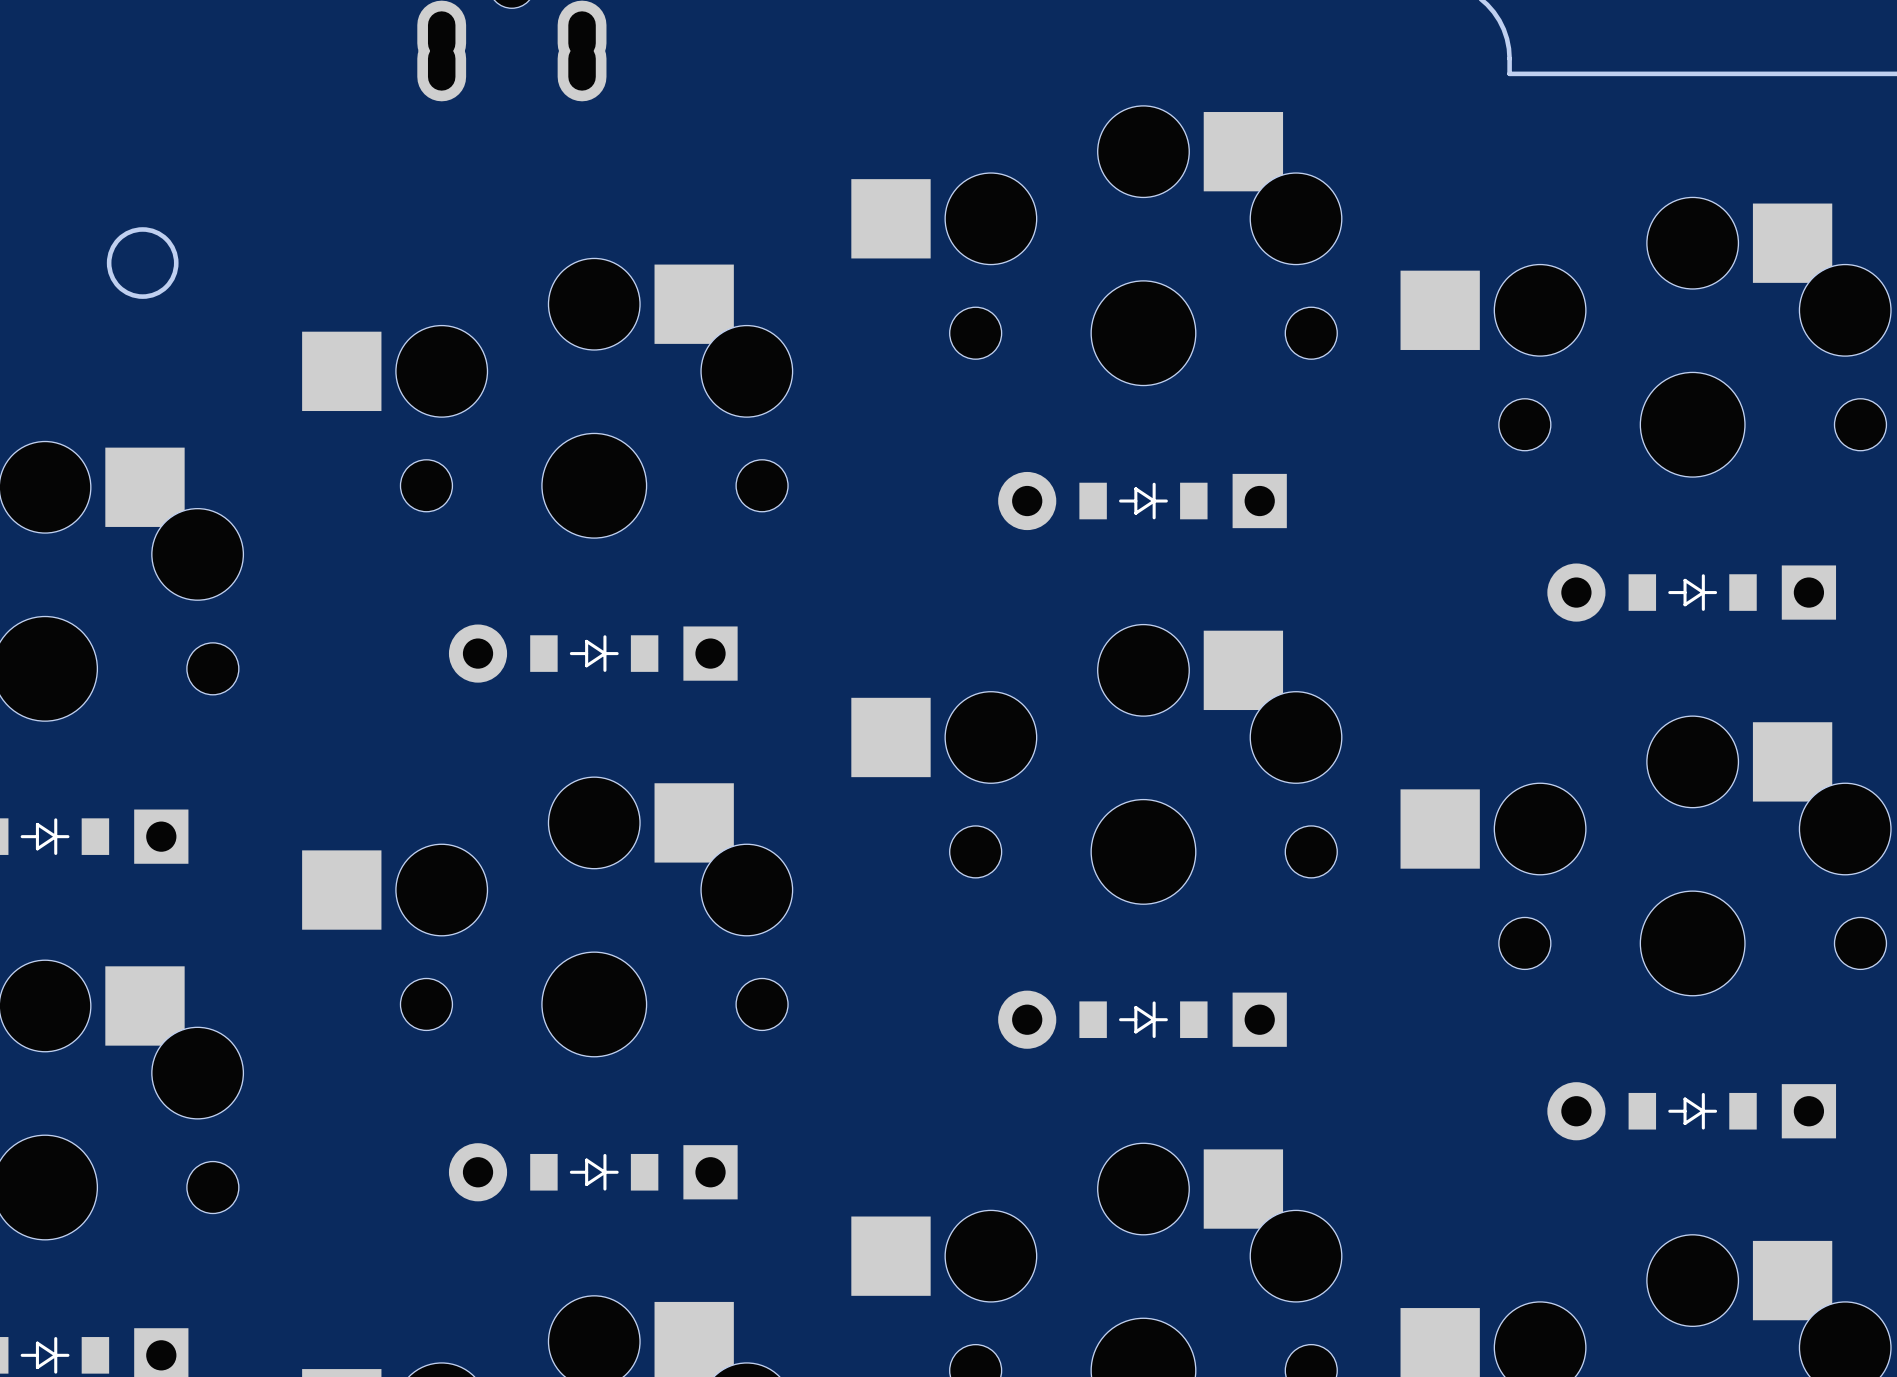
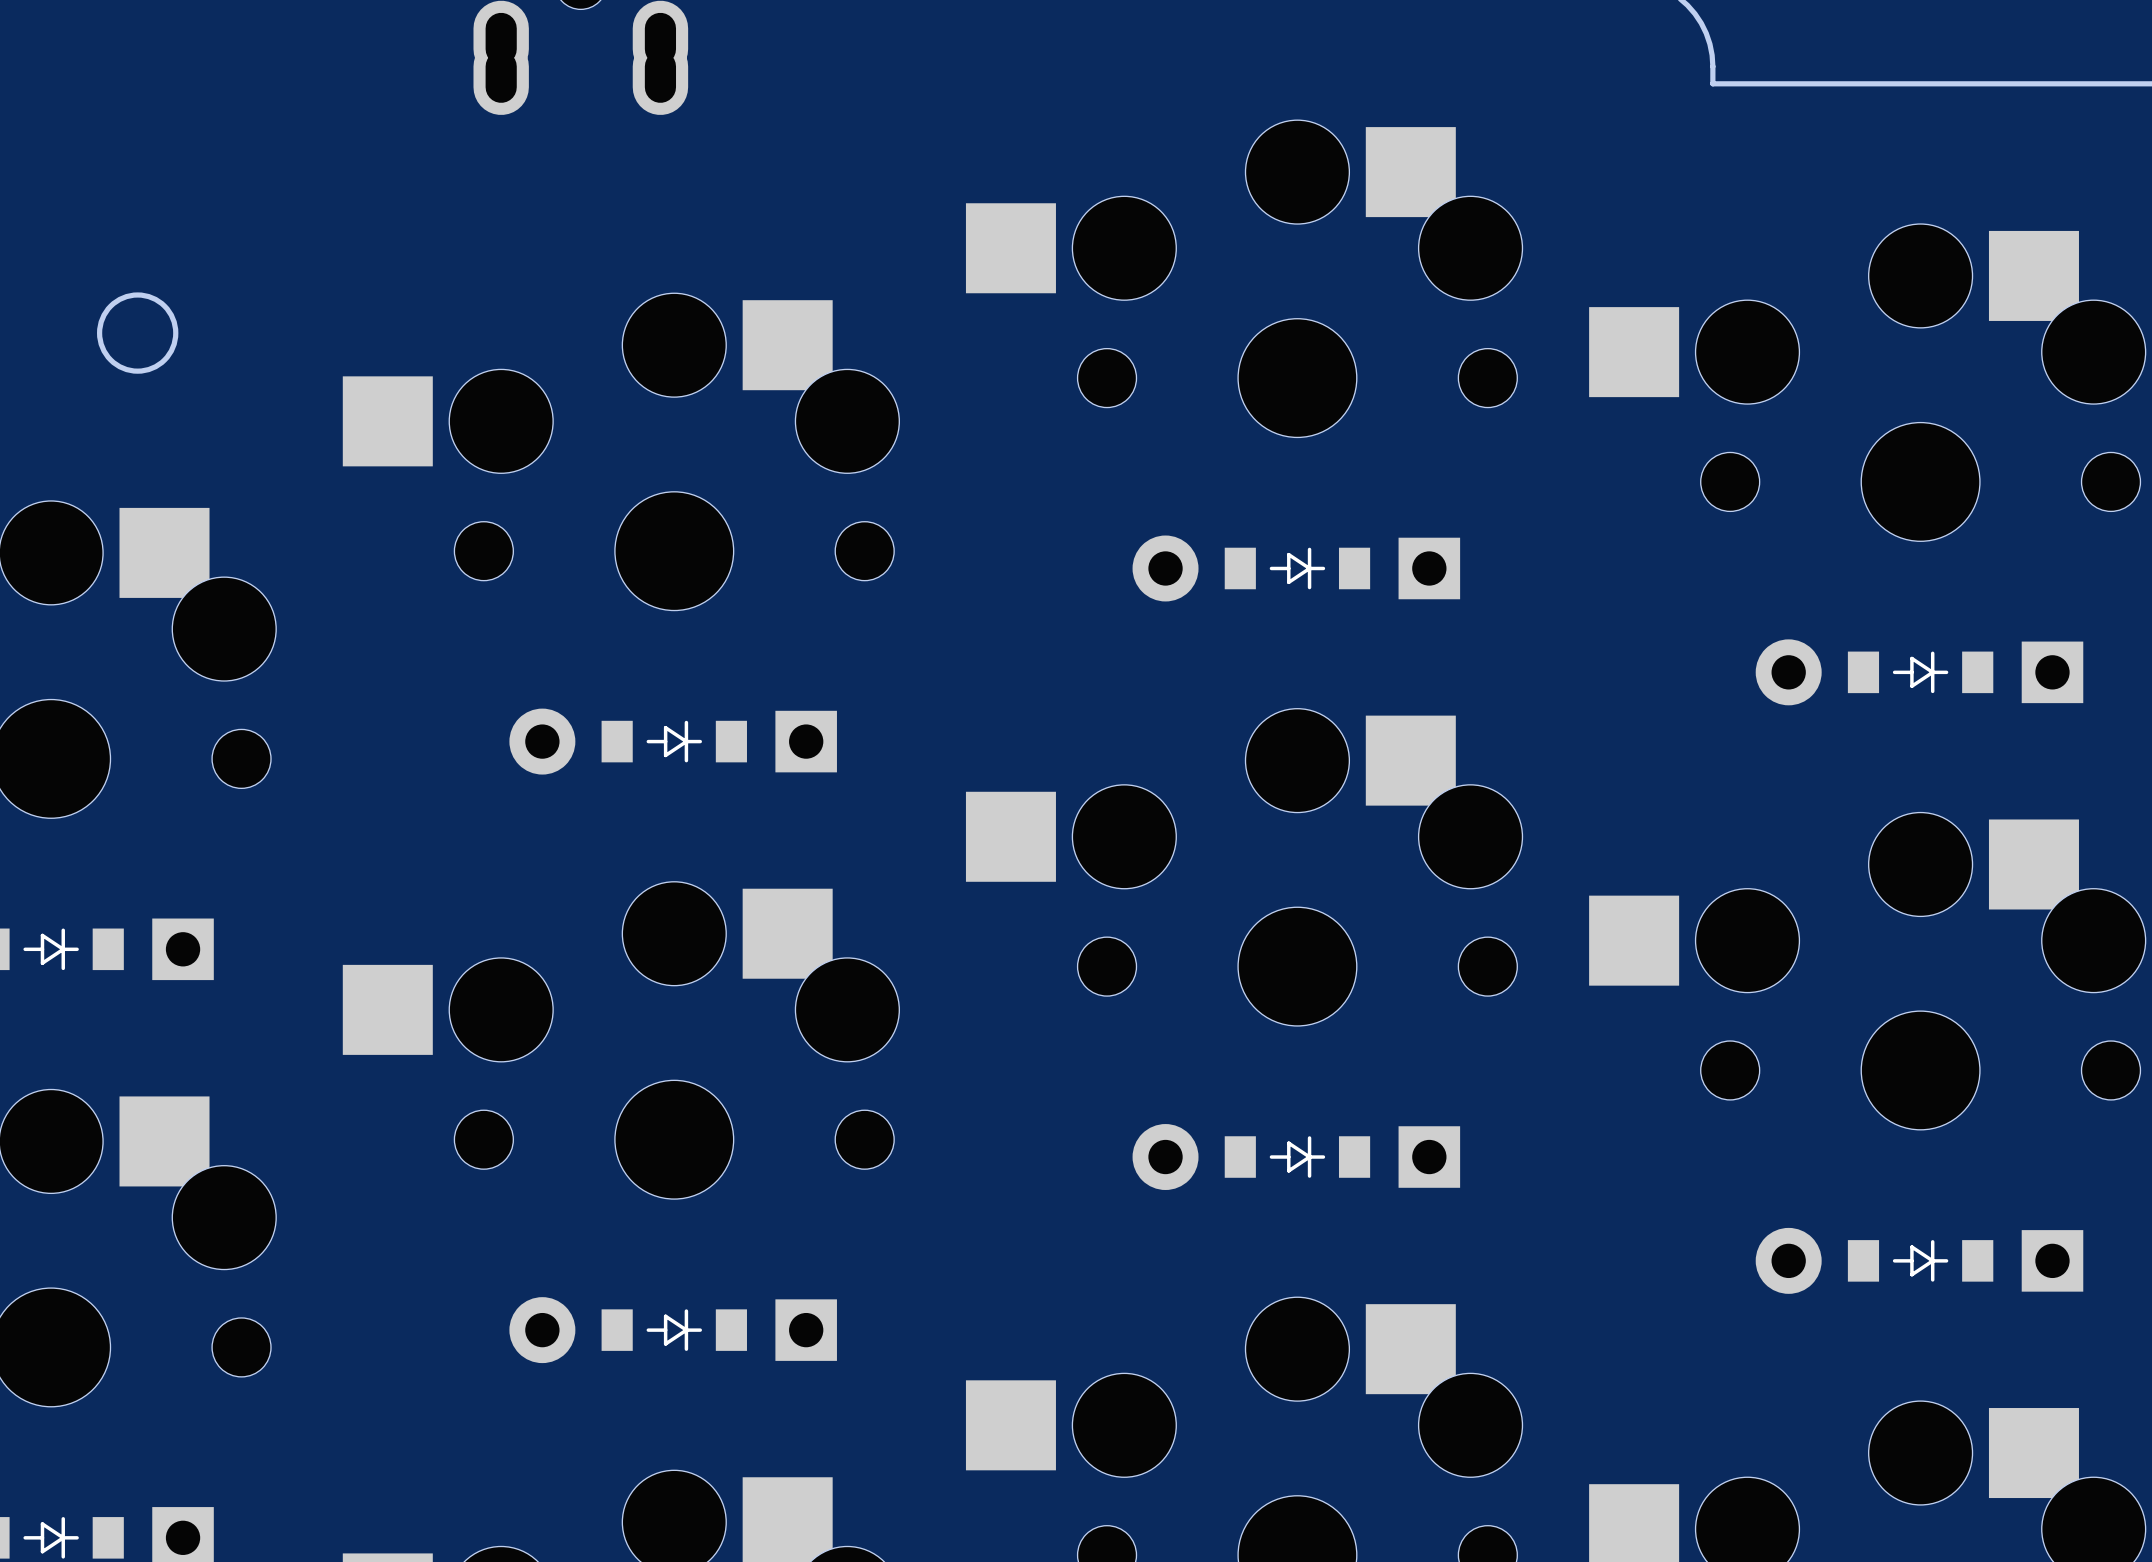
round board edge position: (142, 263) -> (137, 333)

